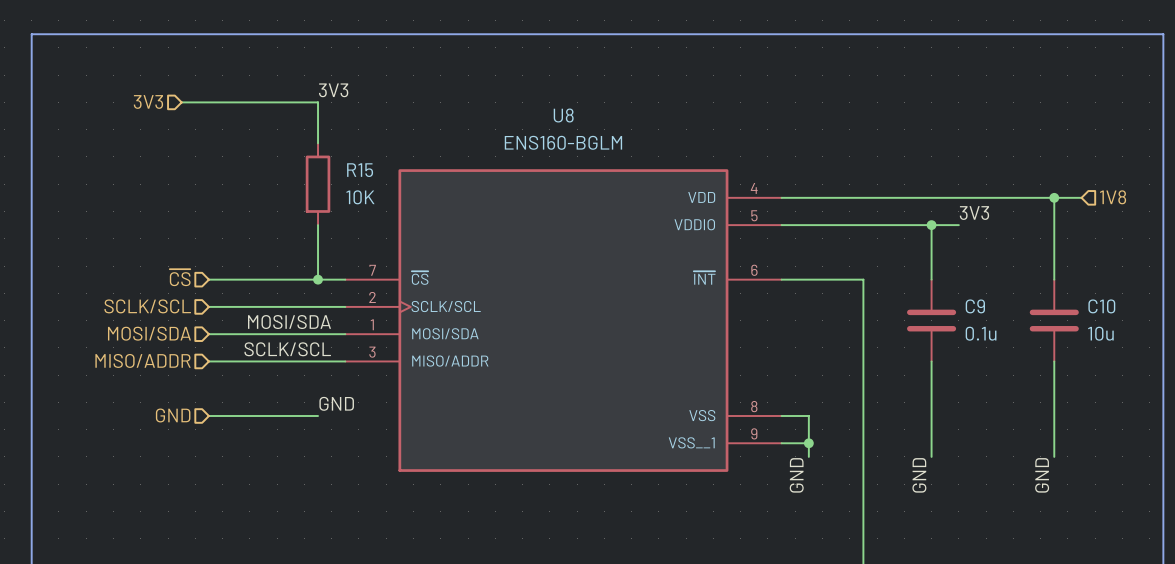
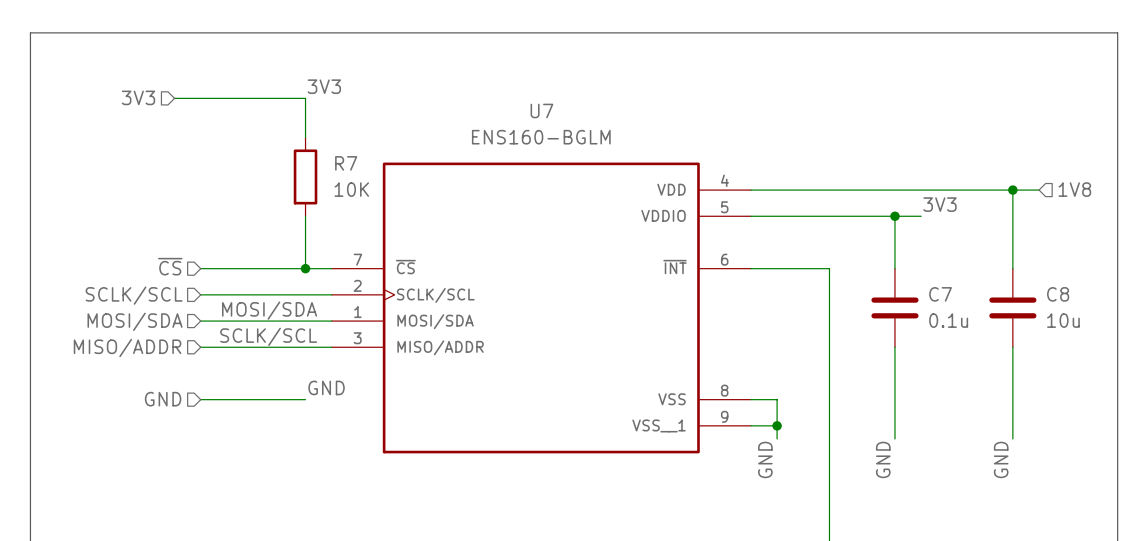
U8 name: U8 (563, 115) -> U7 (541, 110)
R15 name: R15 (360, 170) -> R7 (346, 163)
C9 name: C9 (975, 306) -> C7 (940, 294)
C10 name: C10 (1101, 306) -> C8 (1058, 294)

